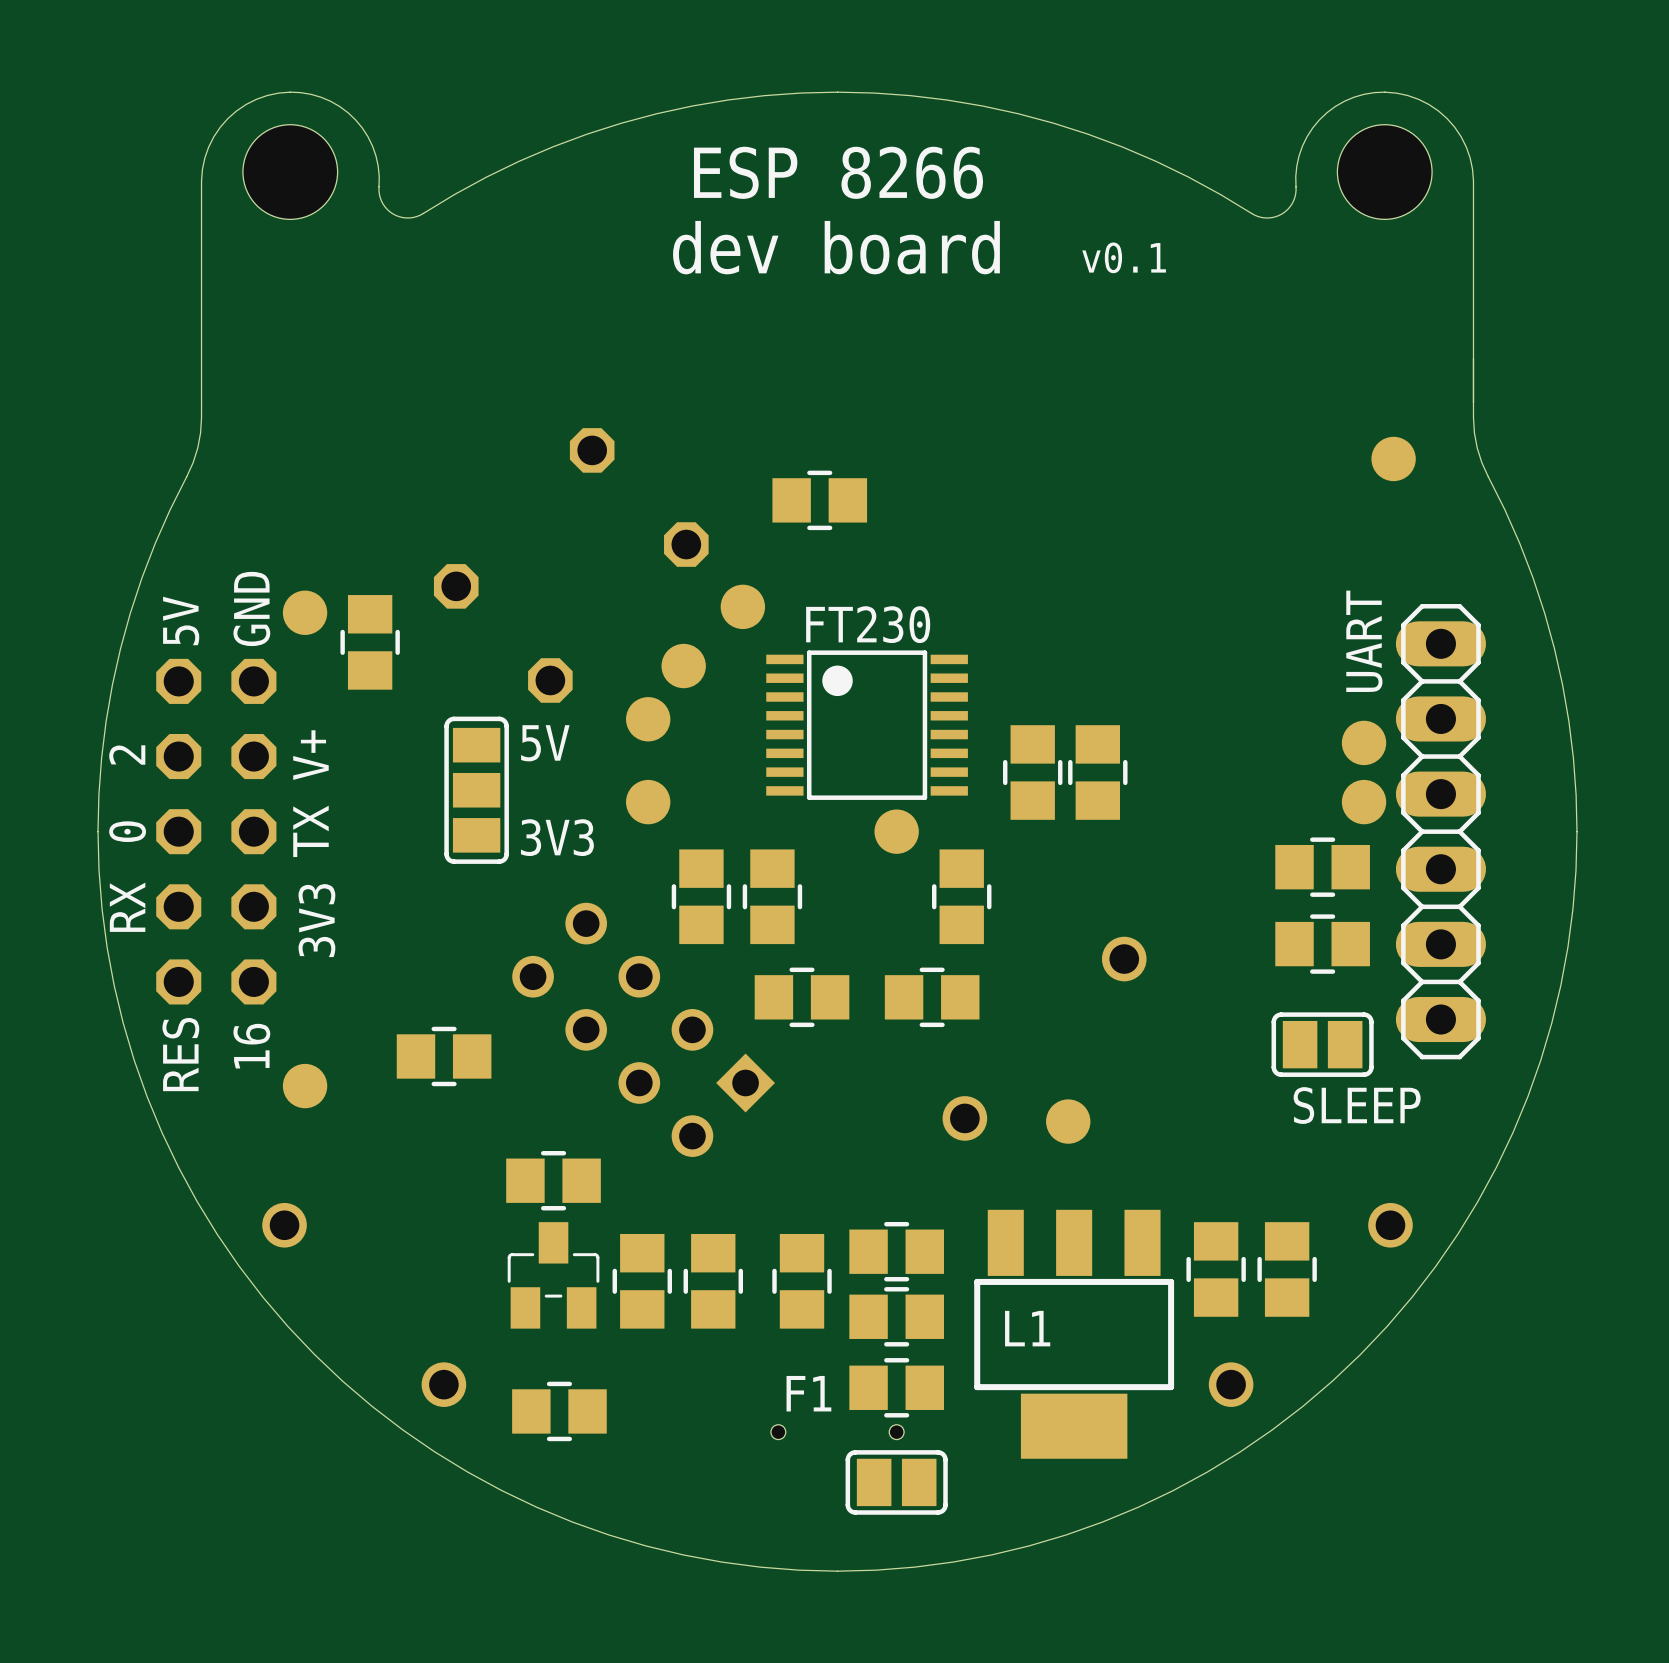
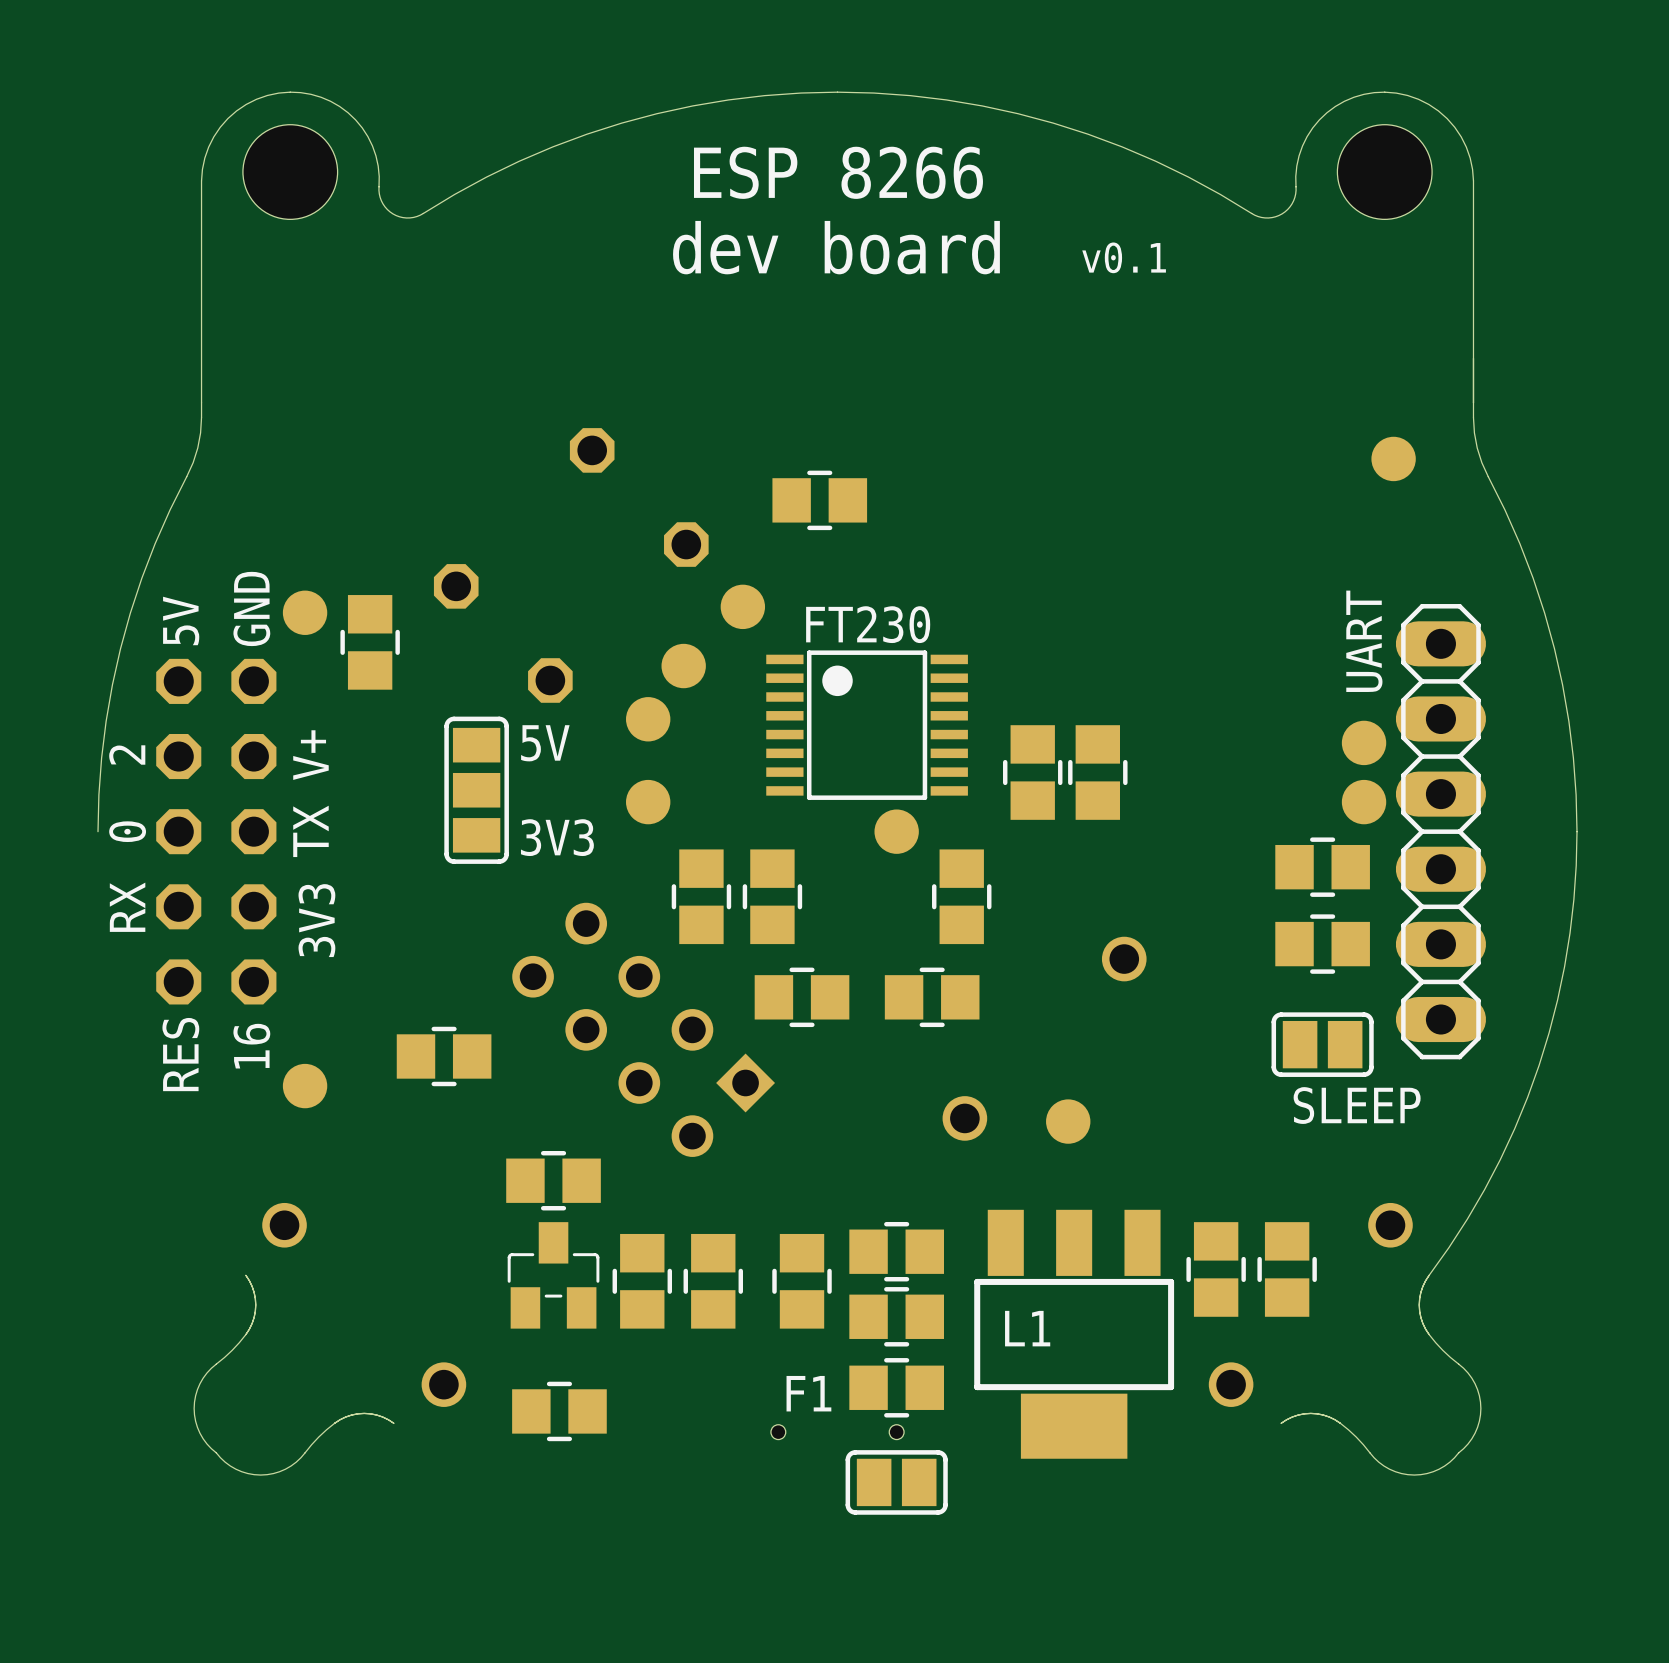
board edge: (1577, 831) (1572, 908) (1560, 985) (1540, 1060) (1527, 1096) (1496, 1167) (1457, 1234) (1412, 1297) (1360, 1354) (1302, 1406) (1240, 1451) (1173, 1490) (1102, 1522) (1066, 1534) (991, 1555) (914, 1567) (837, 1571) (760, 1567) (683, 1555) (608, 1534) (572, 1522) (501, 1490) (434, 1451) (372, 1406) (314, 1354) (262, 1297) (217, 1234) (178, 1167) (147, 1096) (134, 1060) (114, 985) (102, 908) (98, 831) -> (1577, 831) (1576, 865) (1569, 933) (1557, 1000) (1539, 1065) (1527, 1097) (1500, 1159) (1467, 1219) (1429, 1275)
board edge: none -> (1429, 1275) (1420, 1292) (1419, 1304) (1420, 1317) (1429, 1334)
board edge: none -> (1429, 1275) (1420, 1292) (1419, 1304) (1420, 1317) (1429, 1334)
board edge: none -> (245, 1334) (232, 1350) (207, 1372) (197, 1389) (194, 1408) (195, 1421) (199, 1433) (211, 1448) (225, 1462) (241, 1471) (260, 1475) (273, 1473) (296, 1462) (318, 1437) (334, 1423)
board edge: none -> (245, 1334) (254, 1317) (255, 1304) (254, 1292) (245, 1275) (249, 1280) (254, 1292) (255, 1298) (255, 1304) (255, 1311) (254, 1317) (249, 1329) (245, 1334)
board edge: none -> (1429, 1334) (1442, 1350) (1467, 1372) (1479, 1395) (1480, 1408) (1477, 1427) (1467, 1444) (1454, 1457) (1439, 1469) (1427, 1473) (1414, 1475) (1395, 1471) (1378, 1462) (1356, 1437) (1340, 1423)
board edge: none -> (334, 1423) (351, 1415) (364, 1413) (376, 1415) (393, 1423) (388, 1419) (376, 1415) (370, 1413) (364, 1413) (357, 1413) (351, 1415) (339, 1419) (334, 1423)
board edge: none -> (1340, 1423) (1323, 1415) (1310, 1413) (1298, 1415) (1281, 1423) (1286, 1419) (1298, 1415) (1304, 1413) (1310, 1413) (1317, 1413) (1323, 1415) (1335, 1419) (1340, 1423)

